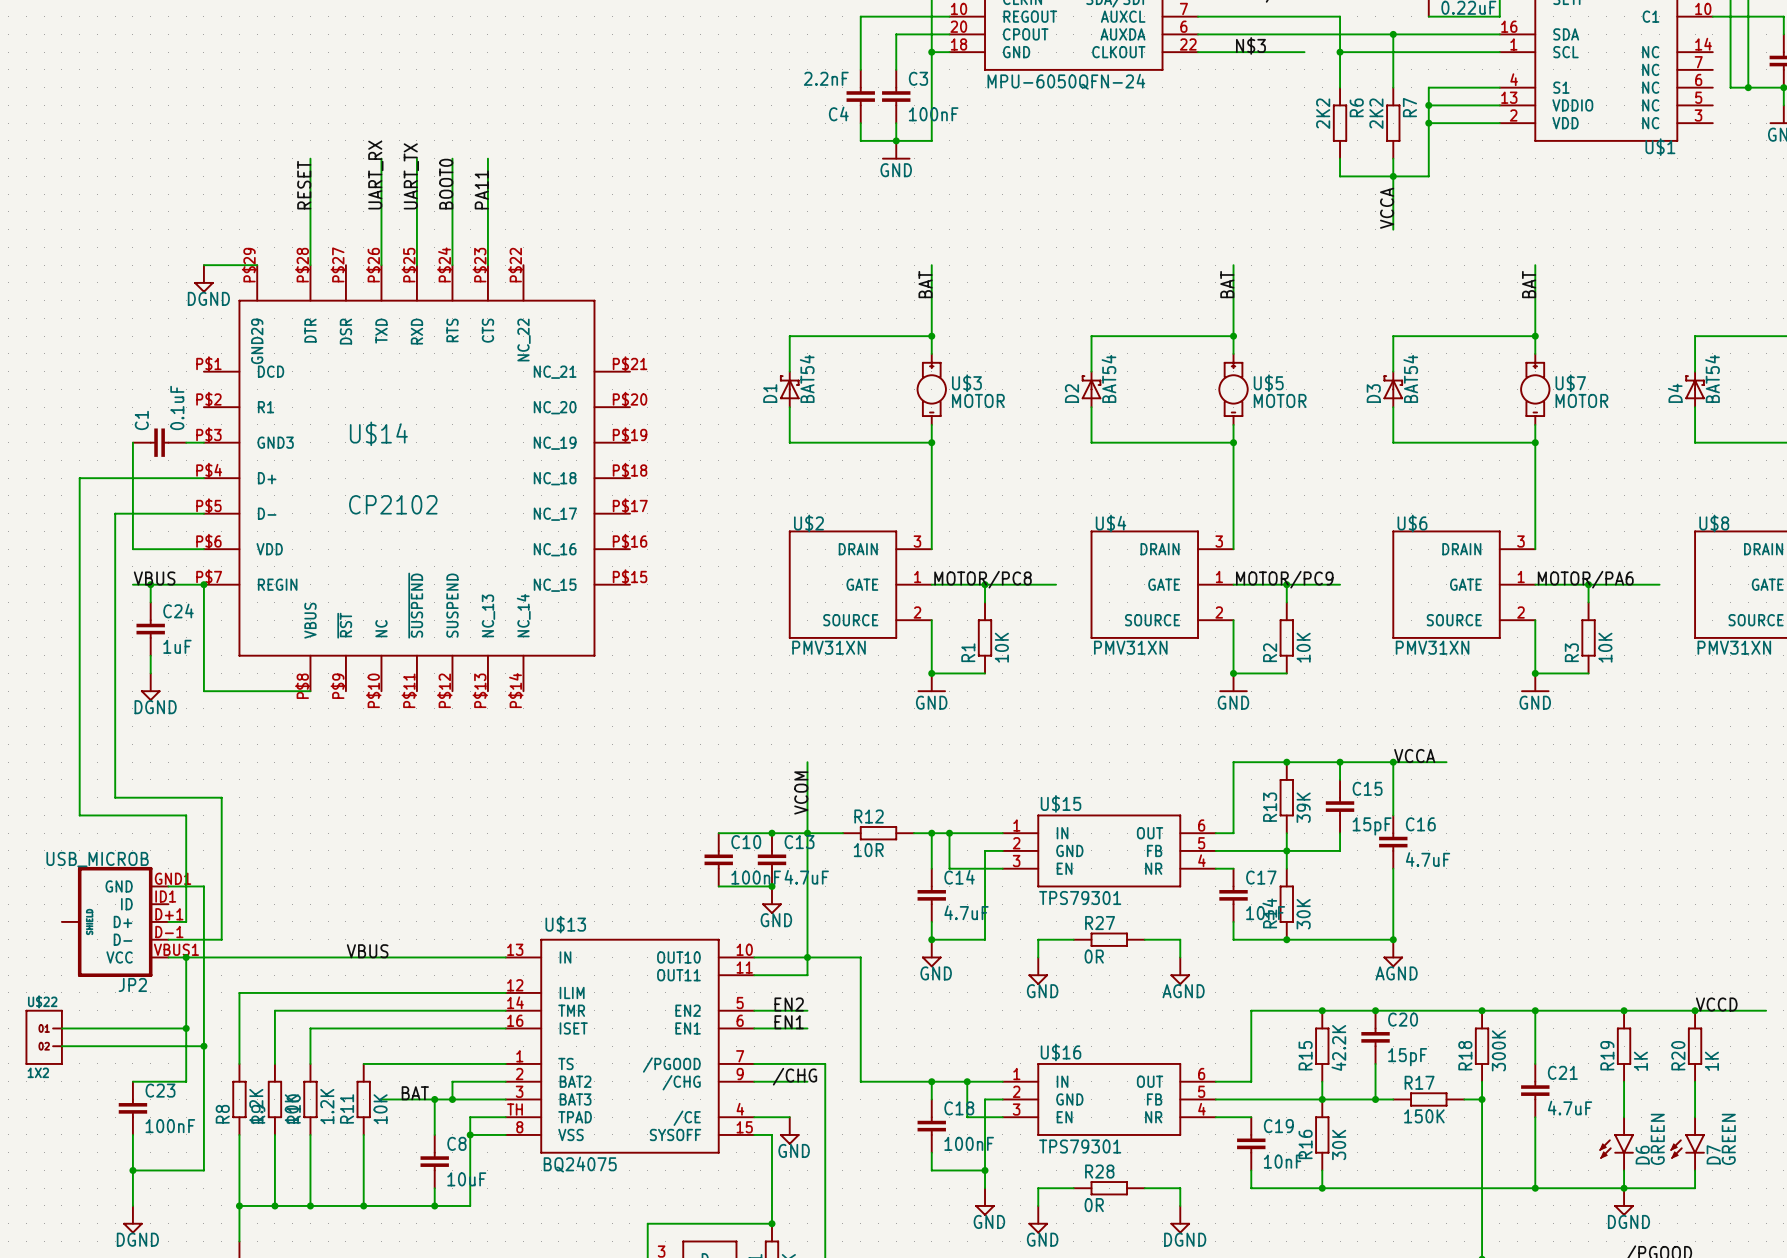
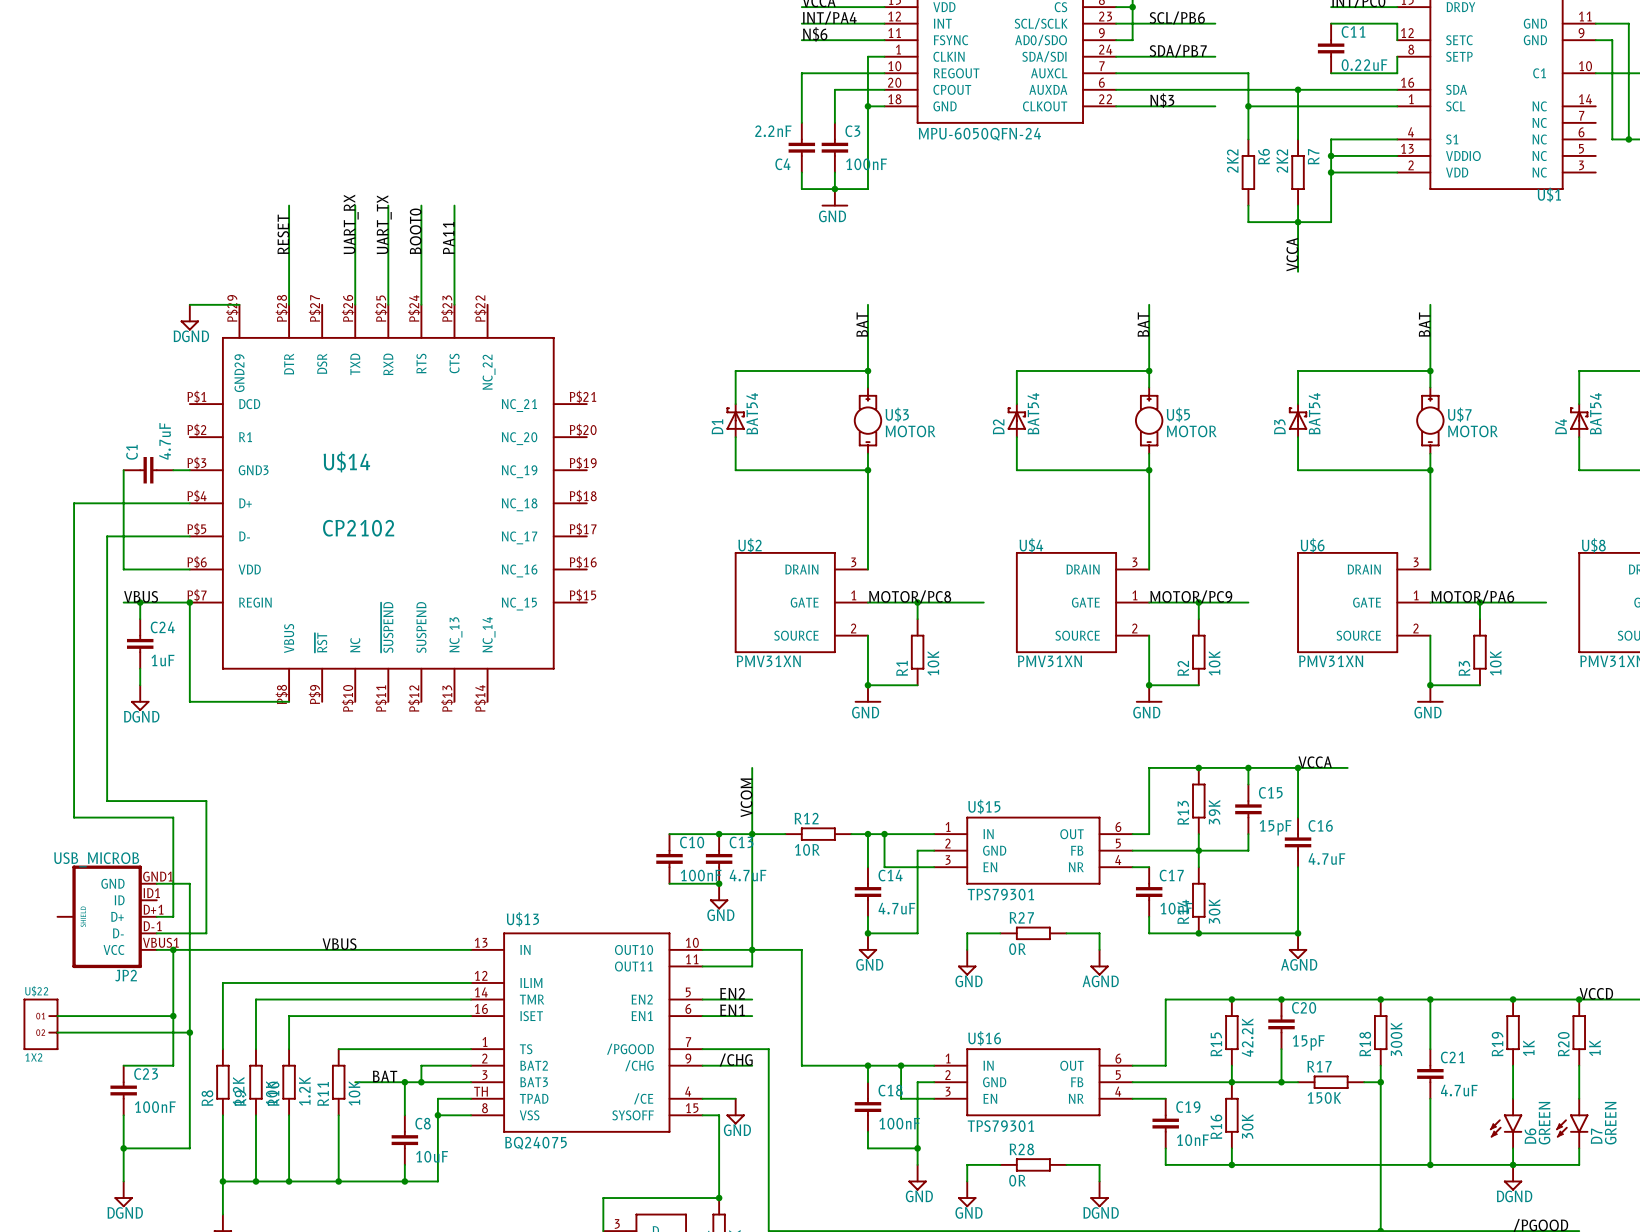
C1 value: 0.1uF (177, 407) -> 4.7uF (165, 441)

